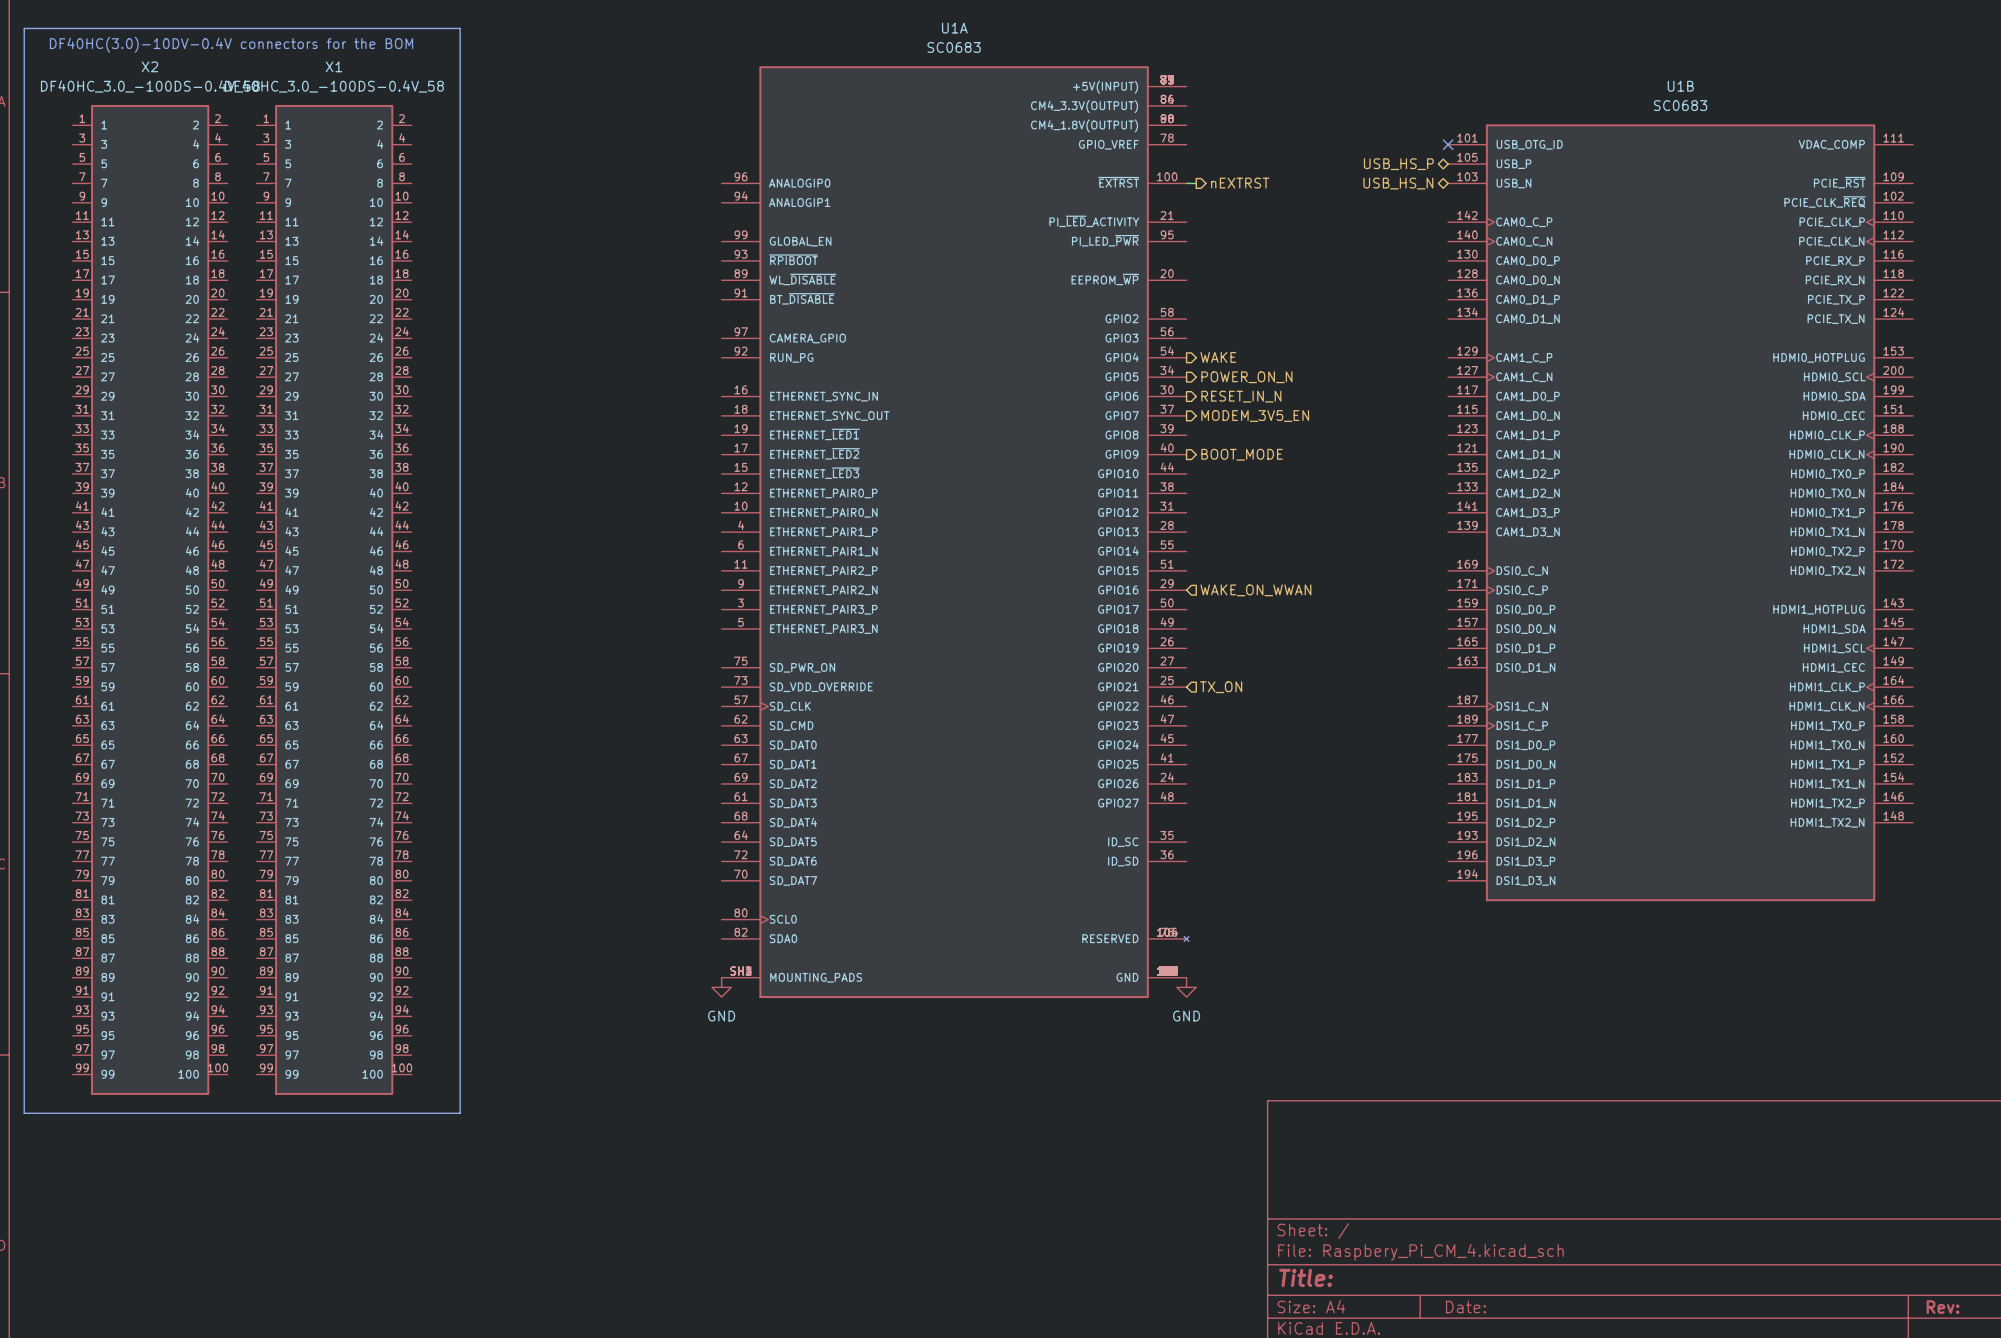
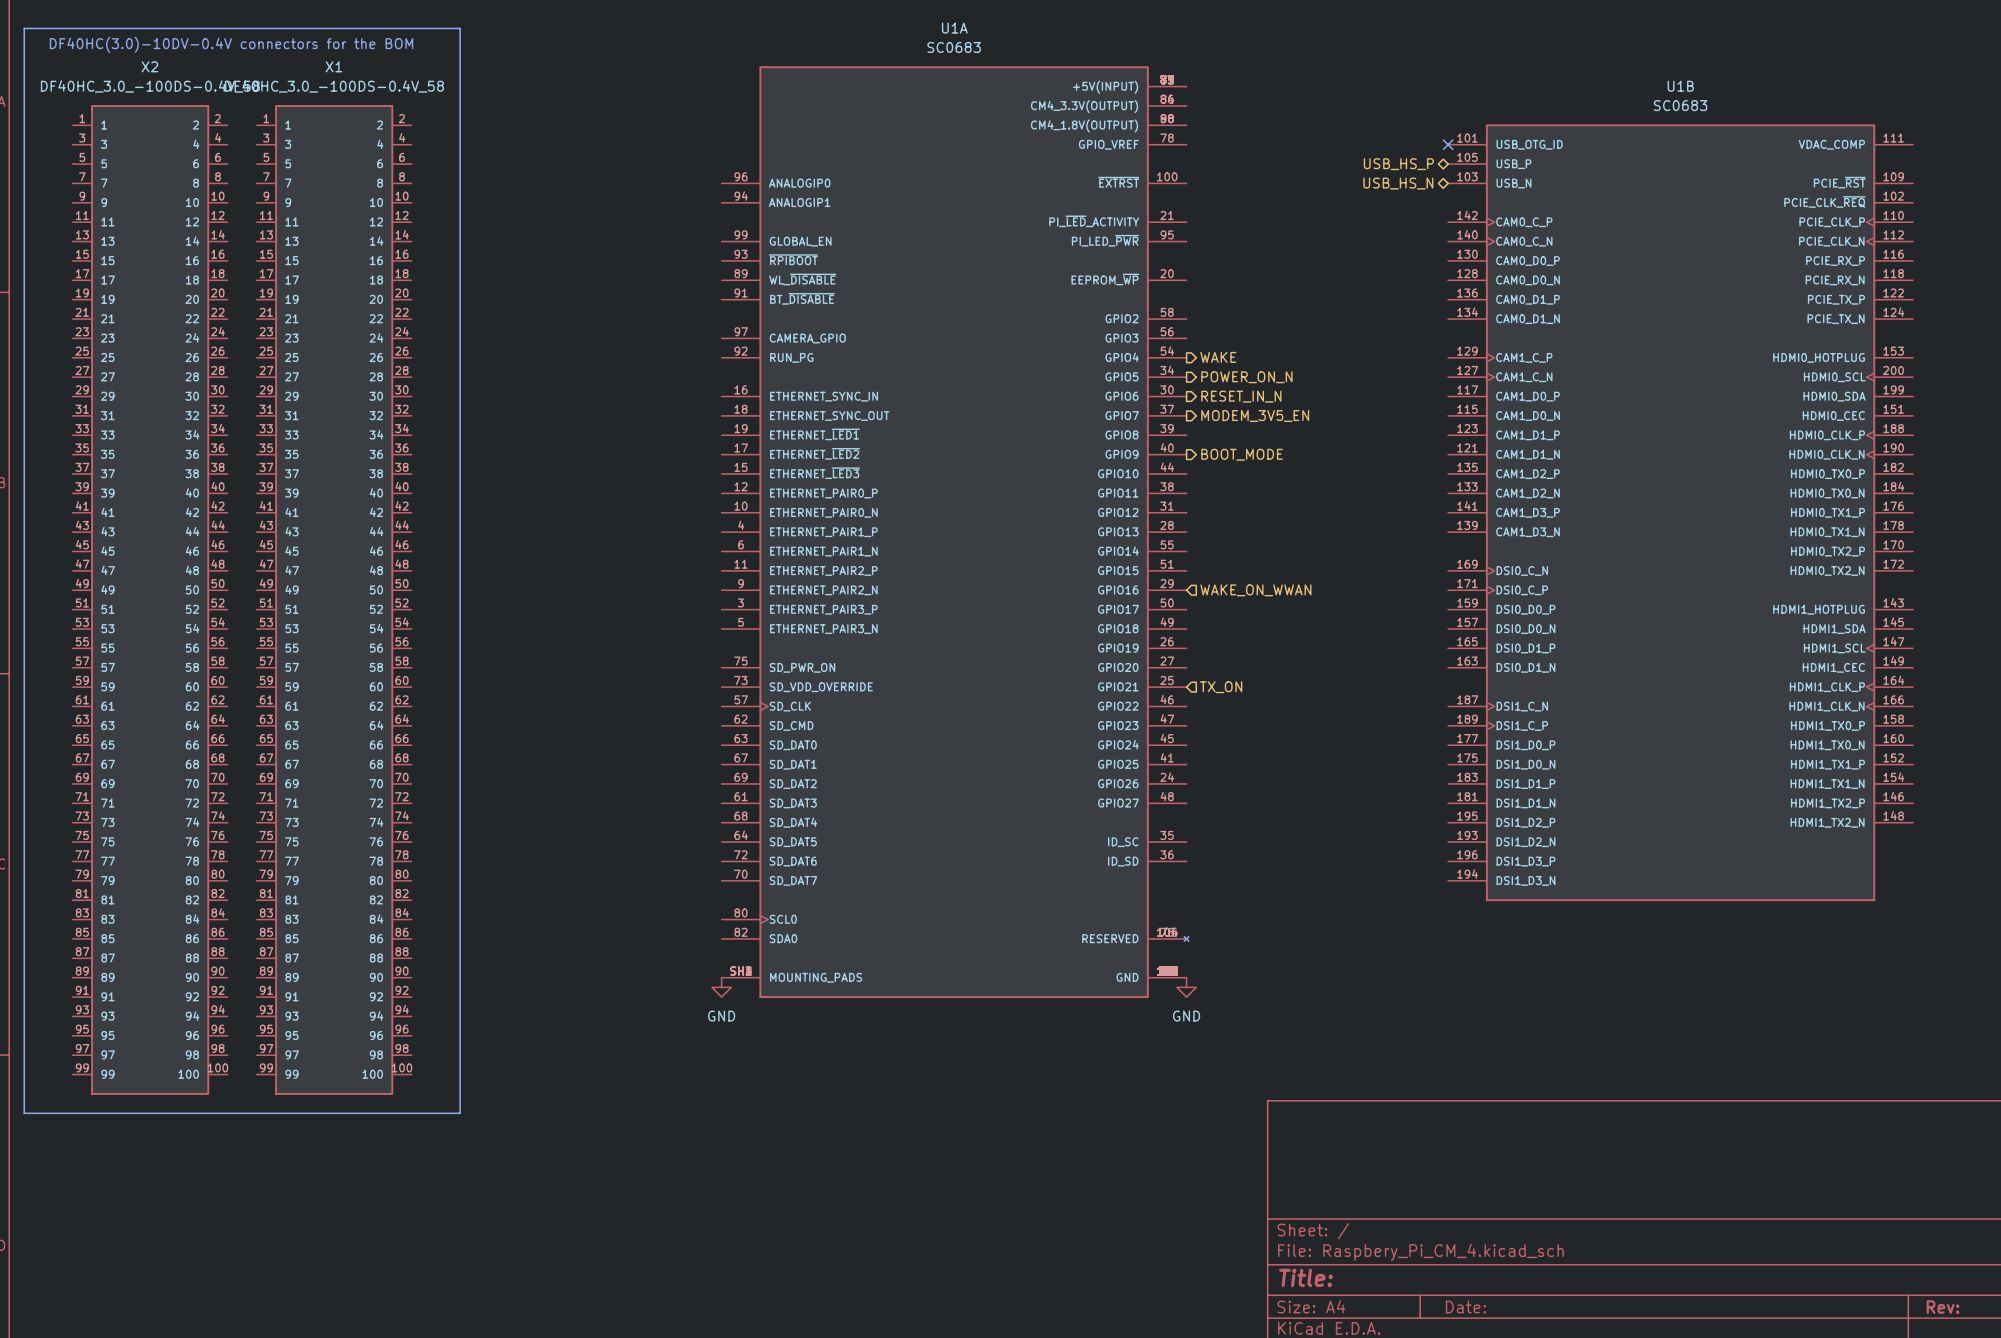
wire: (1186, 183) (1196, 183) -> none
hierarchical label: nEXTRST (1240, 183) -> none

